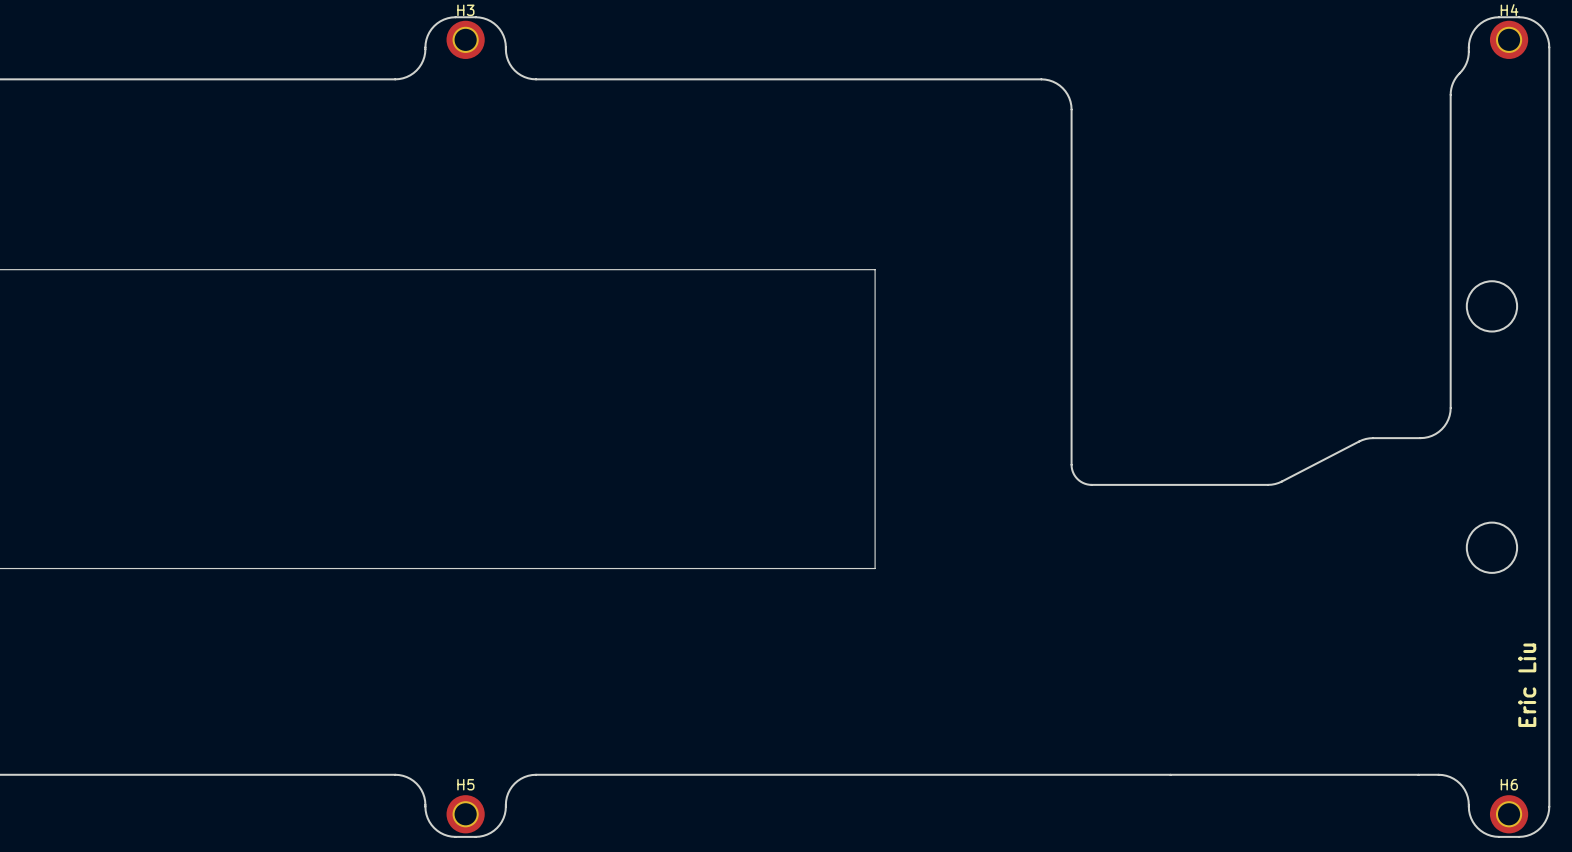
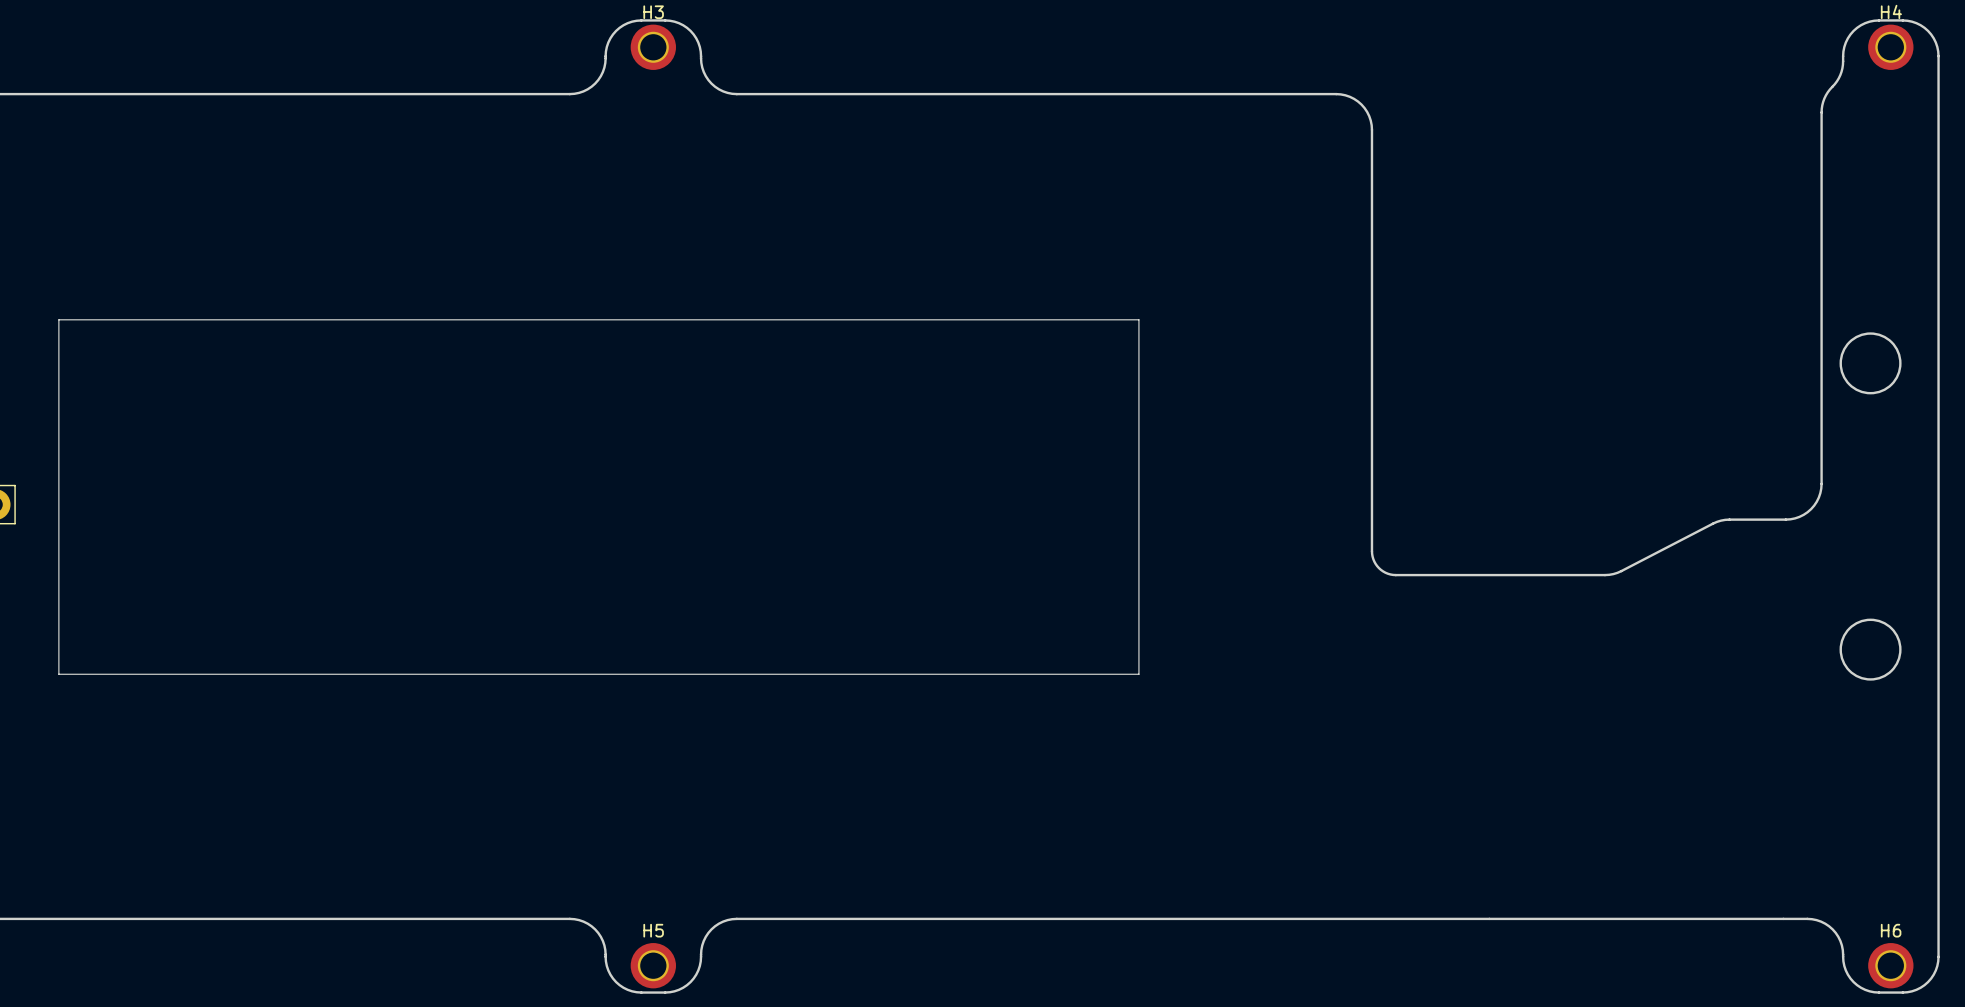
text: Eric Liu (1527, 685) -> none

